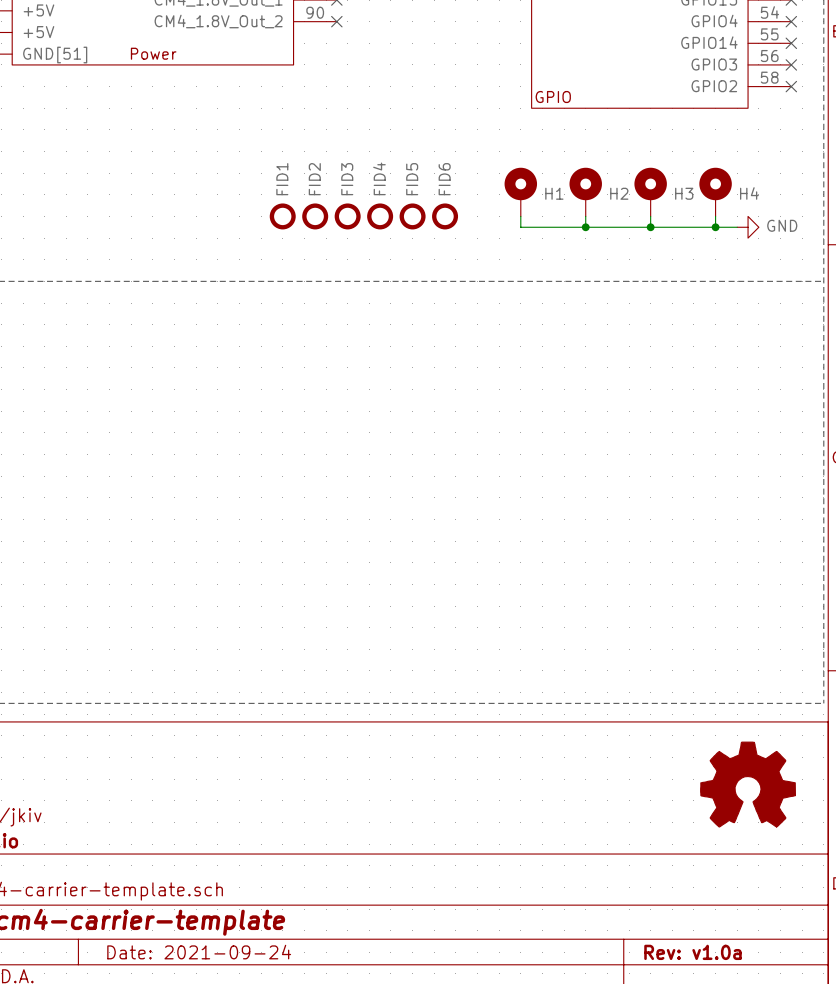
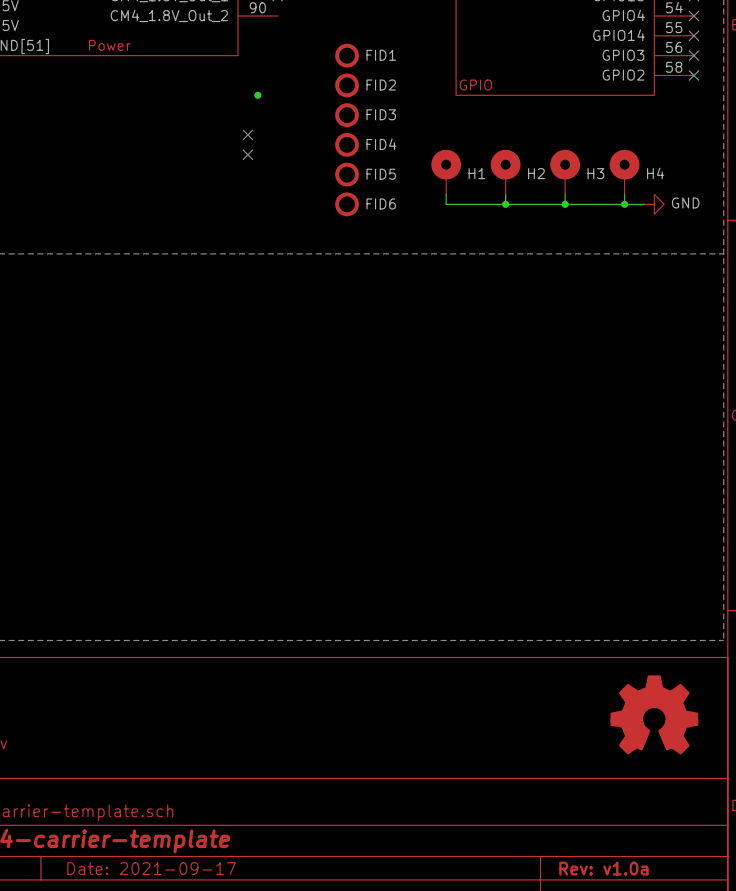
no-connect mark: (336, 21) -> none
junction: none -> (257, 95)
no-connect mark: none -> (247, 134)
no-connect mark: none -> (247, 154)
FID4 name rotation: 0° (379, 178) -> 90° clockwise (381, 144)
FID4 name position: FID4 (379, 178) -> FID4 (381, 144)
FID1 name rotation: 0° (282, 179) -> 90° clockwise (381, 55)
FID1 name position: FID1 (282, 179) -> FID1 (381, 55)
FID2 name rotation: 0° (314, 179) -> 90° clockwise (381, 85)
FID2 name position: FID2 (314, 179) -> FID2 (381, 85)
FID3 name rotation: 0° (347, 179) -> 90° clockwise (381, 114)
FID3 name position: FID3 (347, 179) -> FID3 (381, 114)
FID5 name rotation: 0° (412, 179) -> 90° clockwise (381, 174)
FID6 name rotation: 0° (444, 179) -> 90° clockwise (381, 203)
FID6 name position: FID6 (444, 179) -> FID6 (381, 203)
FID1 position: (282, 216) -> (347, 55)
FID2 position: (315, 216) -> (347, 85)
FID3 position: (347, 216) -> (347, 115)
FID4 position: (380, 216) -> (347, 144)
FID5 position: (412, 216) -> (347, 174)
FID6 position: (445, 216) -> (347, 204)
title block: Date: 2021-09-24 (199, 952) -> Date: 2021-09-17 (151, 868)

